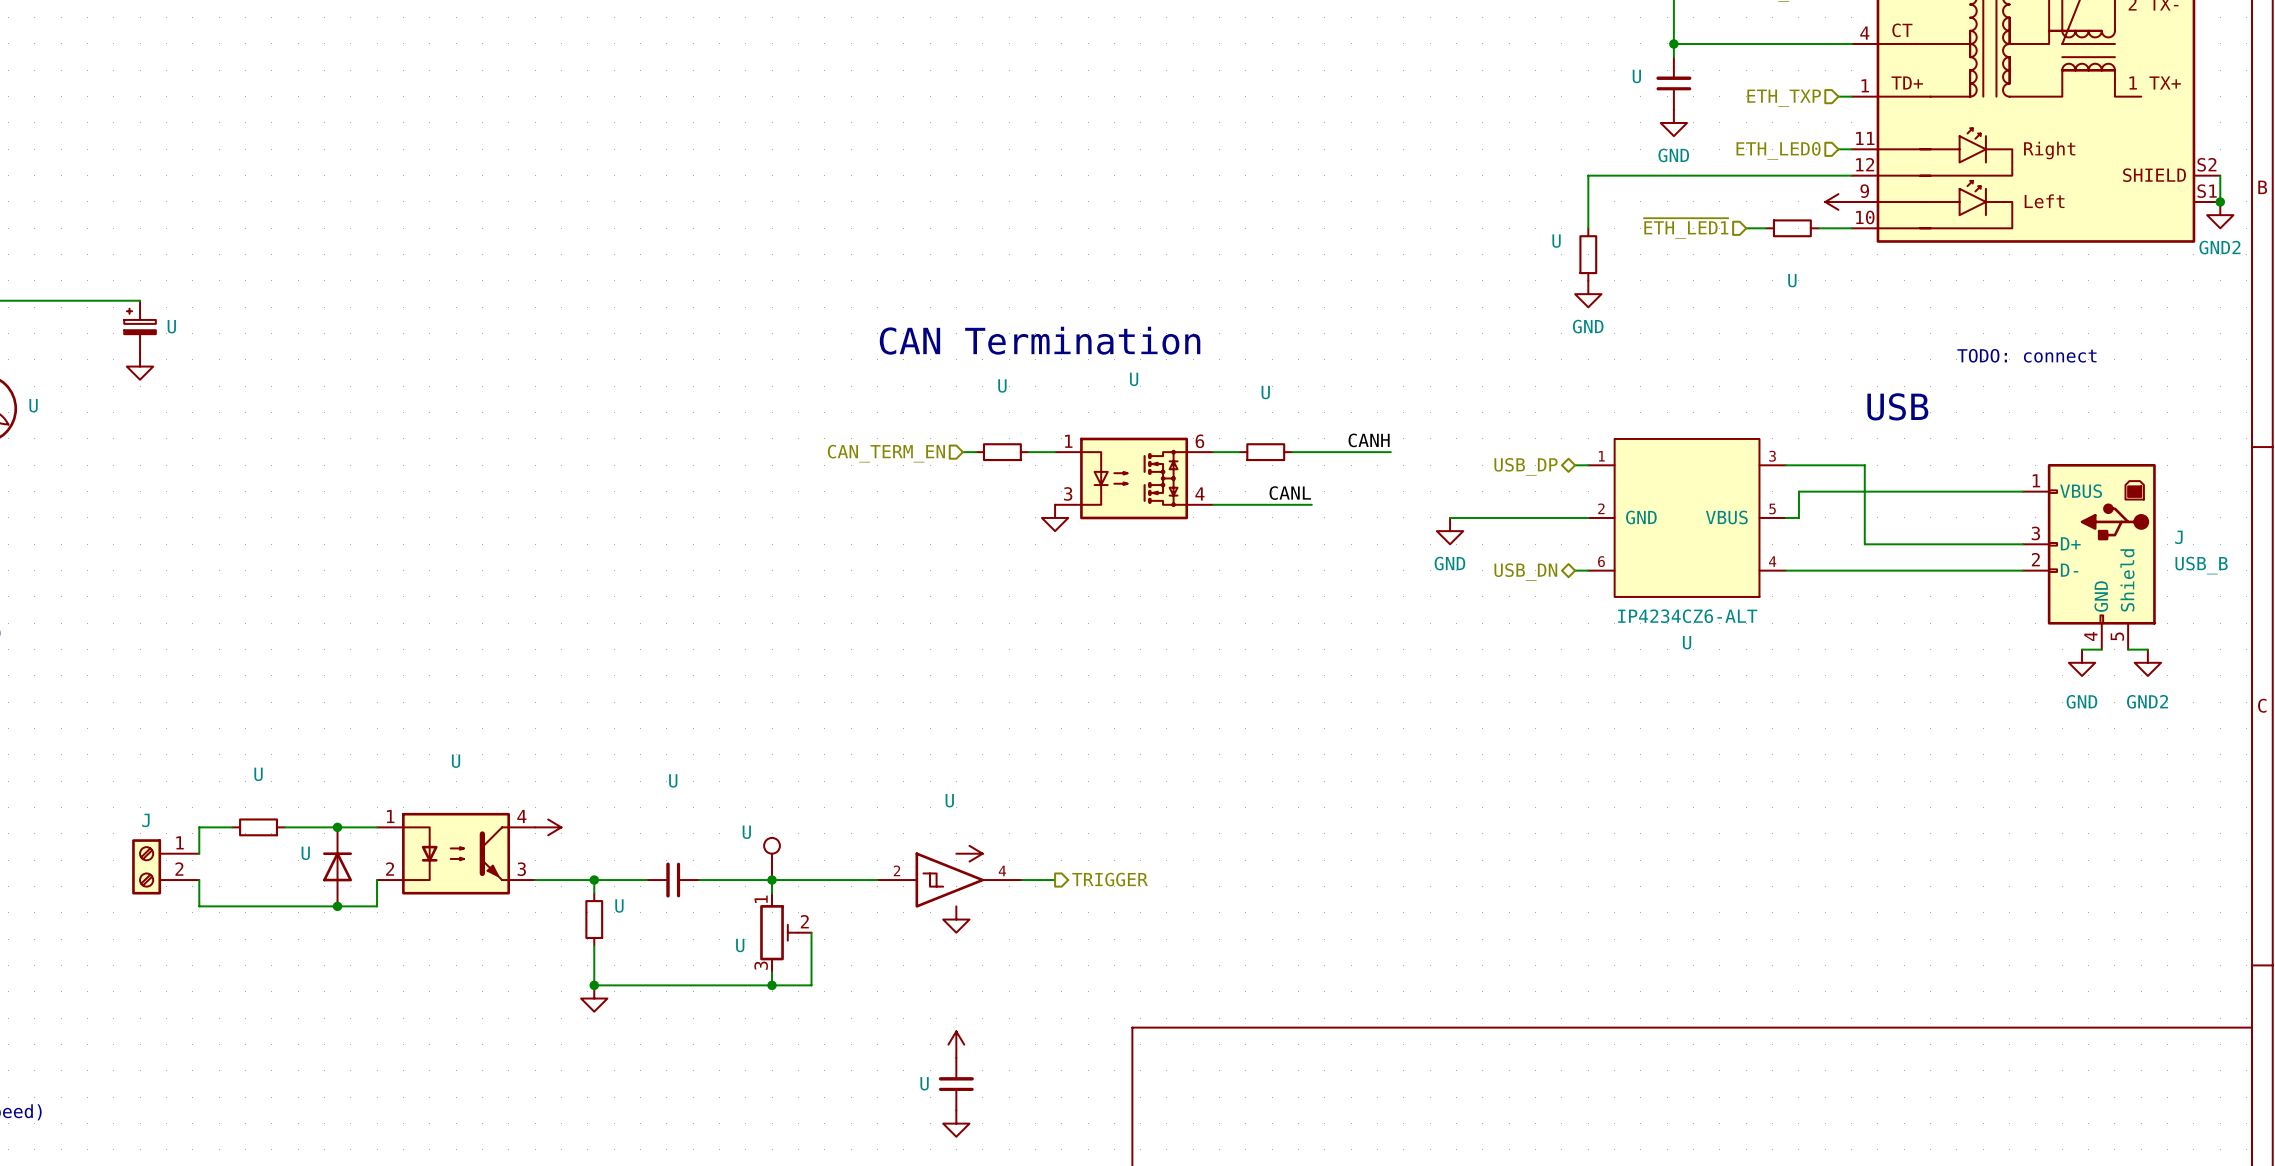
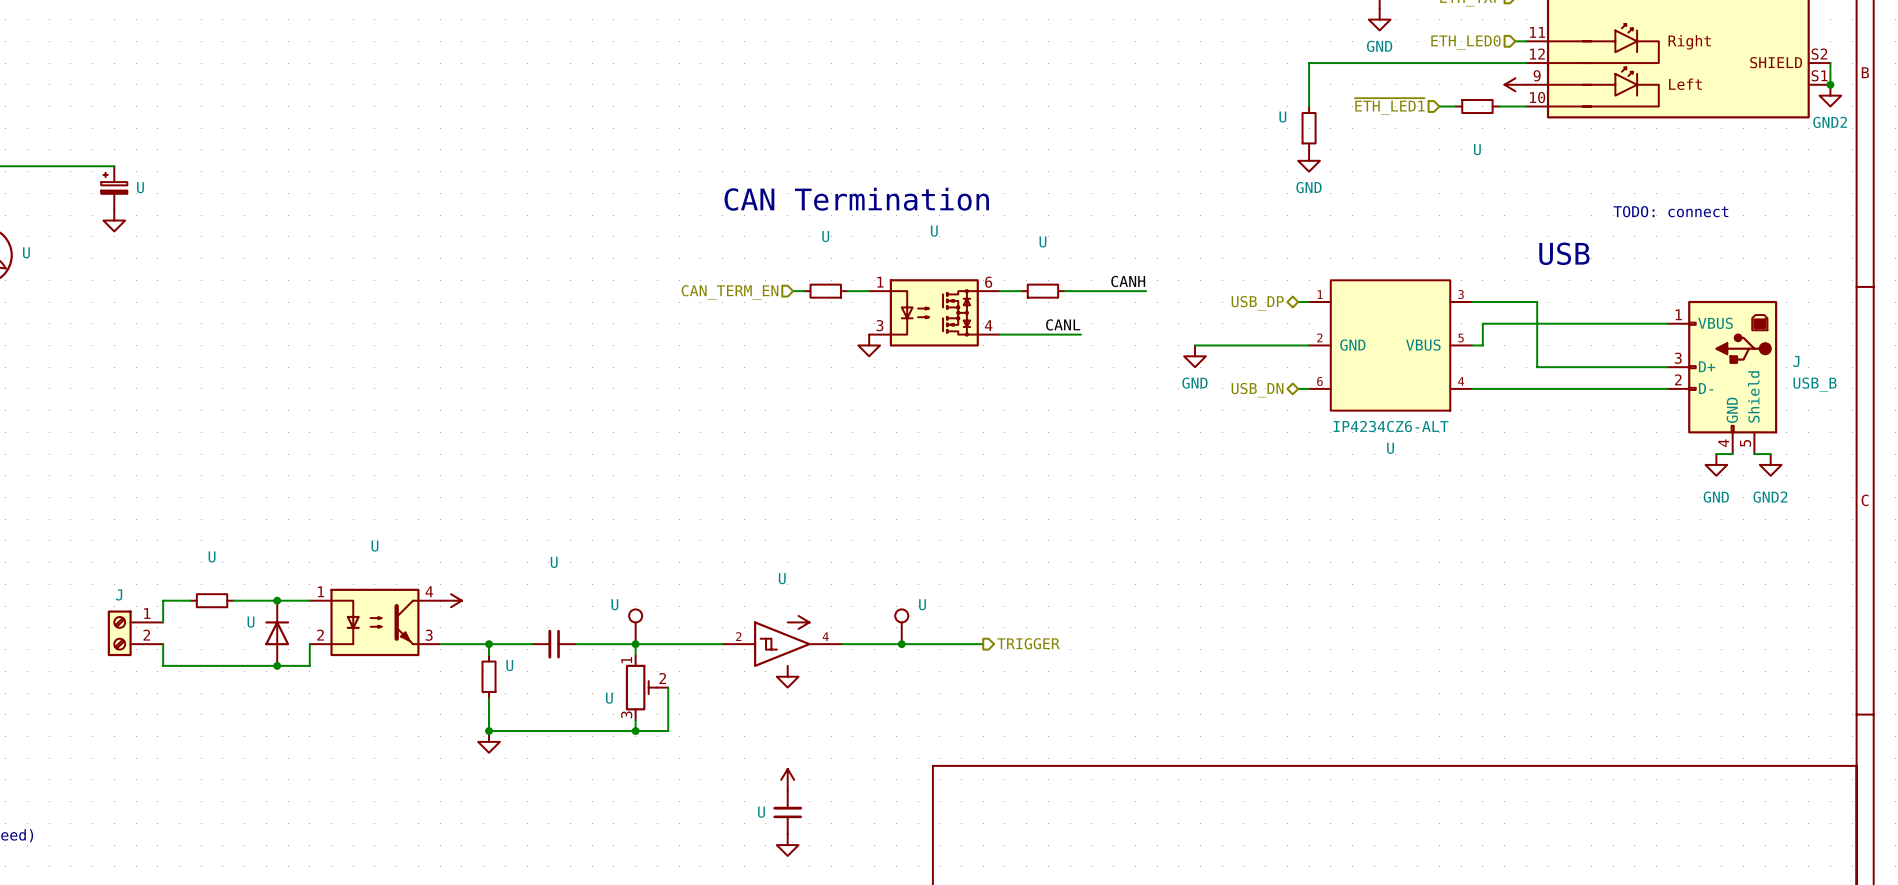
U: none -> (901, 626)
hierarchical label position: TRIGGER (1110, 879) -> TRIGGER (1028, 643)
wire: none -> (869, 644) (983, 644)
junction: none -> (901, 644)

